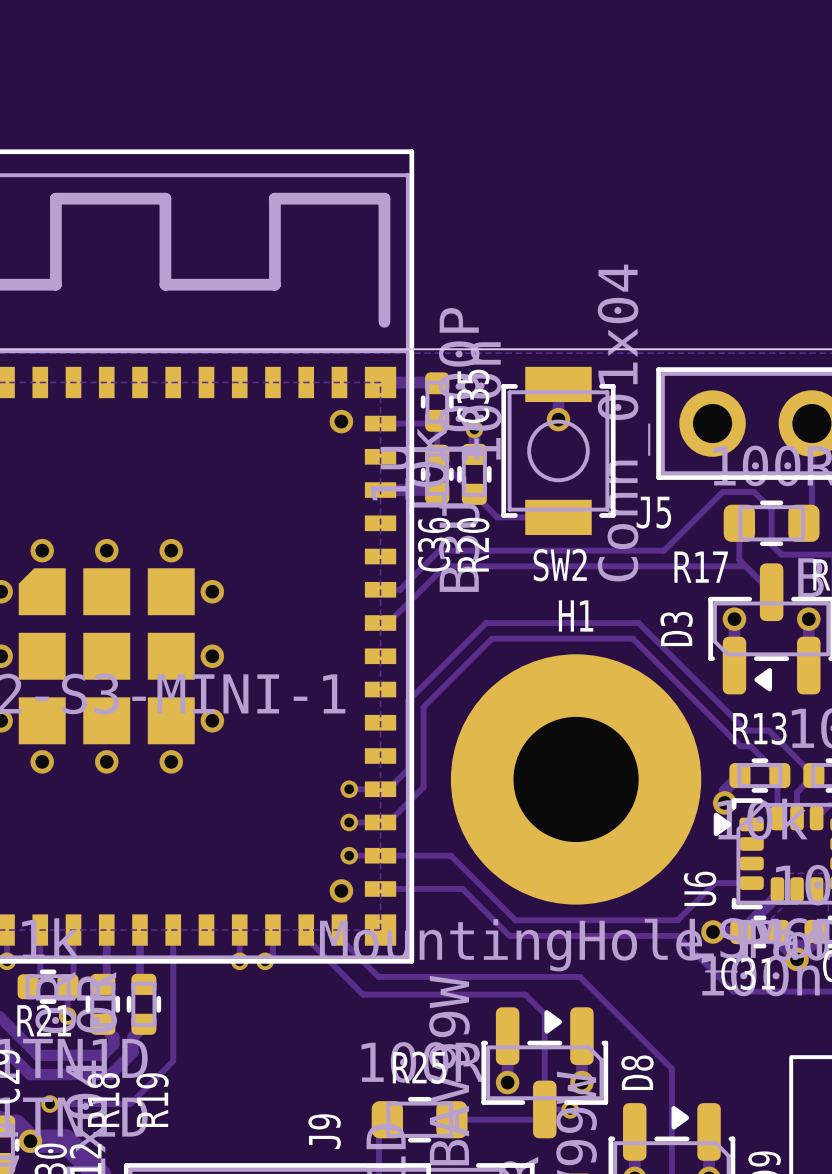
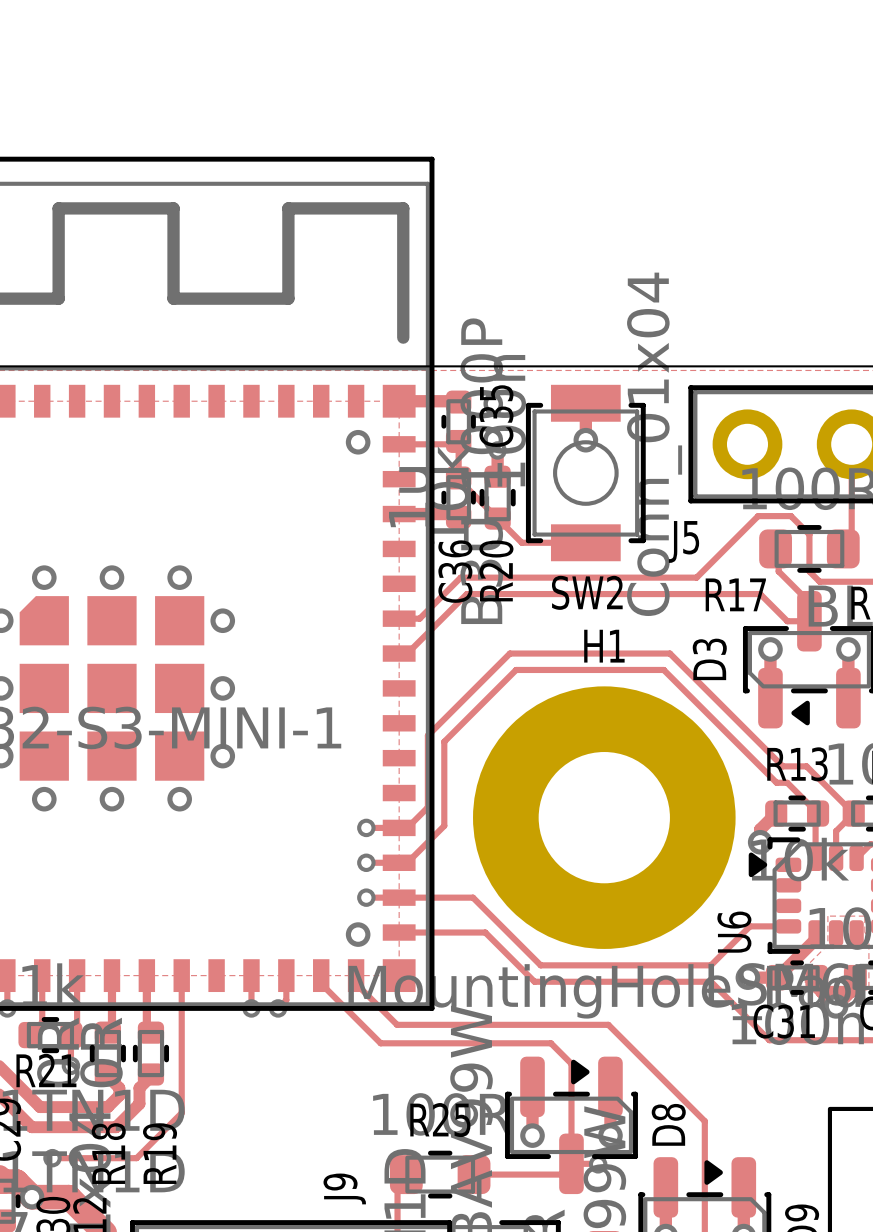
track: (739, 536) (739, 559) (771, 592) -> none
track: (724, 566) (745, 566) -> (760, 594) (787, 621) (809, 621) (809, 602) (778, 571) (778, 565) (775, 562)

